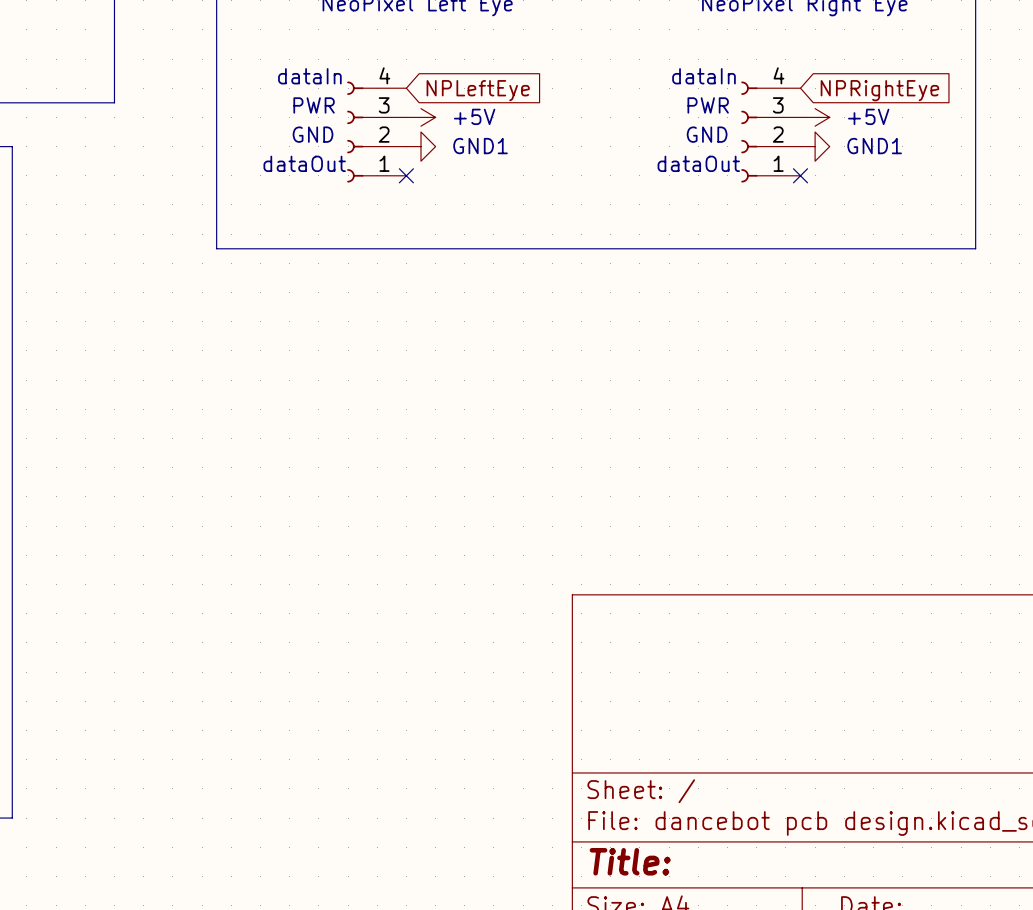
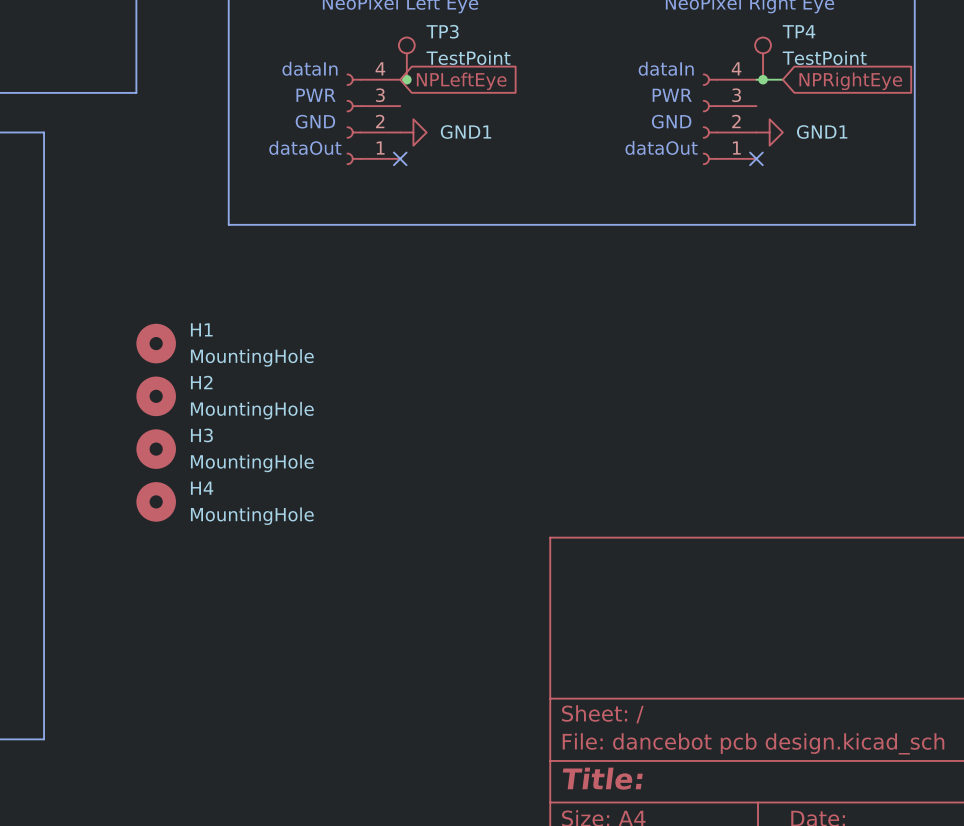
TP3: none -> TestPoint (406, 58)
TP4: none -> TestPoint (763, 58)
junction: none -> (406, 79)
wire: none -> (756, 79) (782, 79)
junction: none -> (763, 79)
global label position: NPRightEye (879, 90) -> NPRightEye (850, 81)
power symbol: +5V (420, 117) -> none
power symbol: +5V (815, 117) -> none
H1: none -> MountingHole (156, 343)
H2: none -> MountingHole (156, 396)
H3: none -> MountingHole (156, 449)
H4: none -> MountingHole (156, 501)

